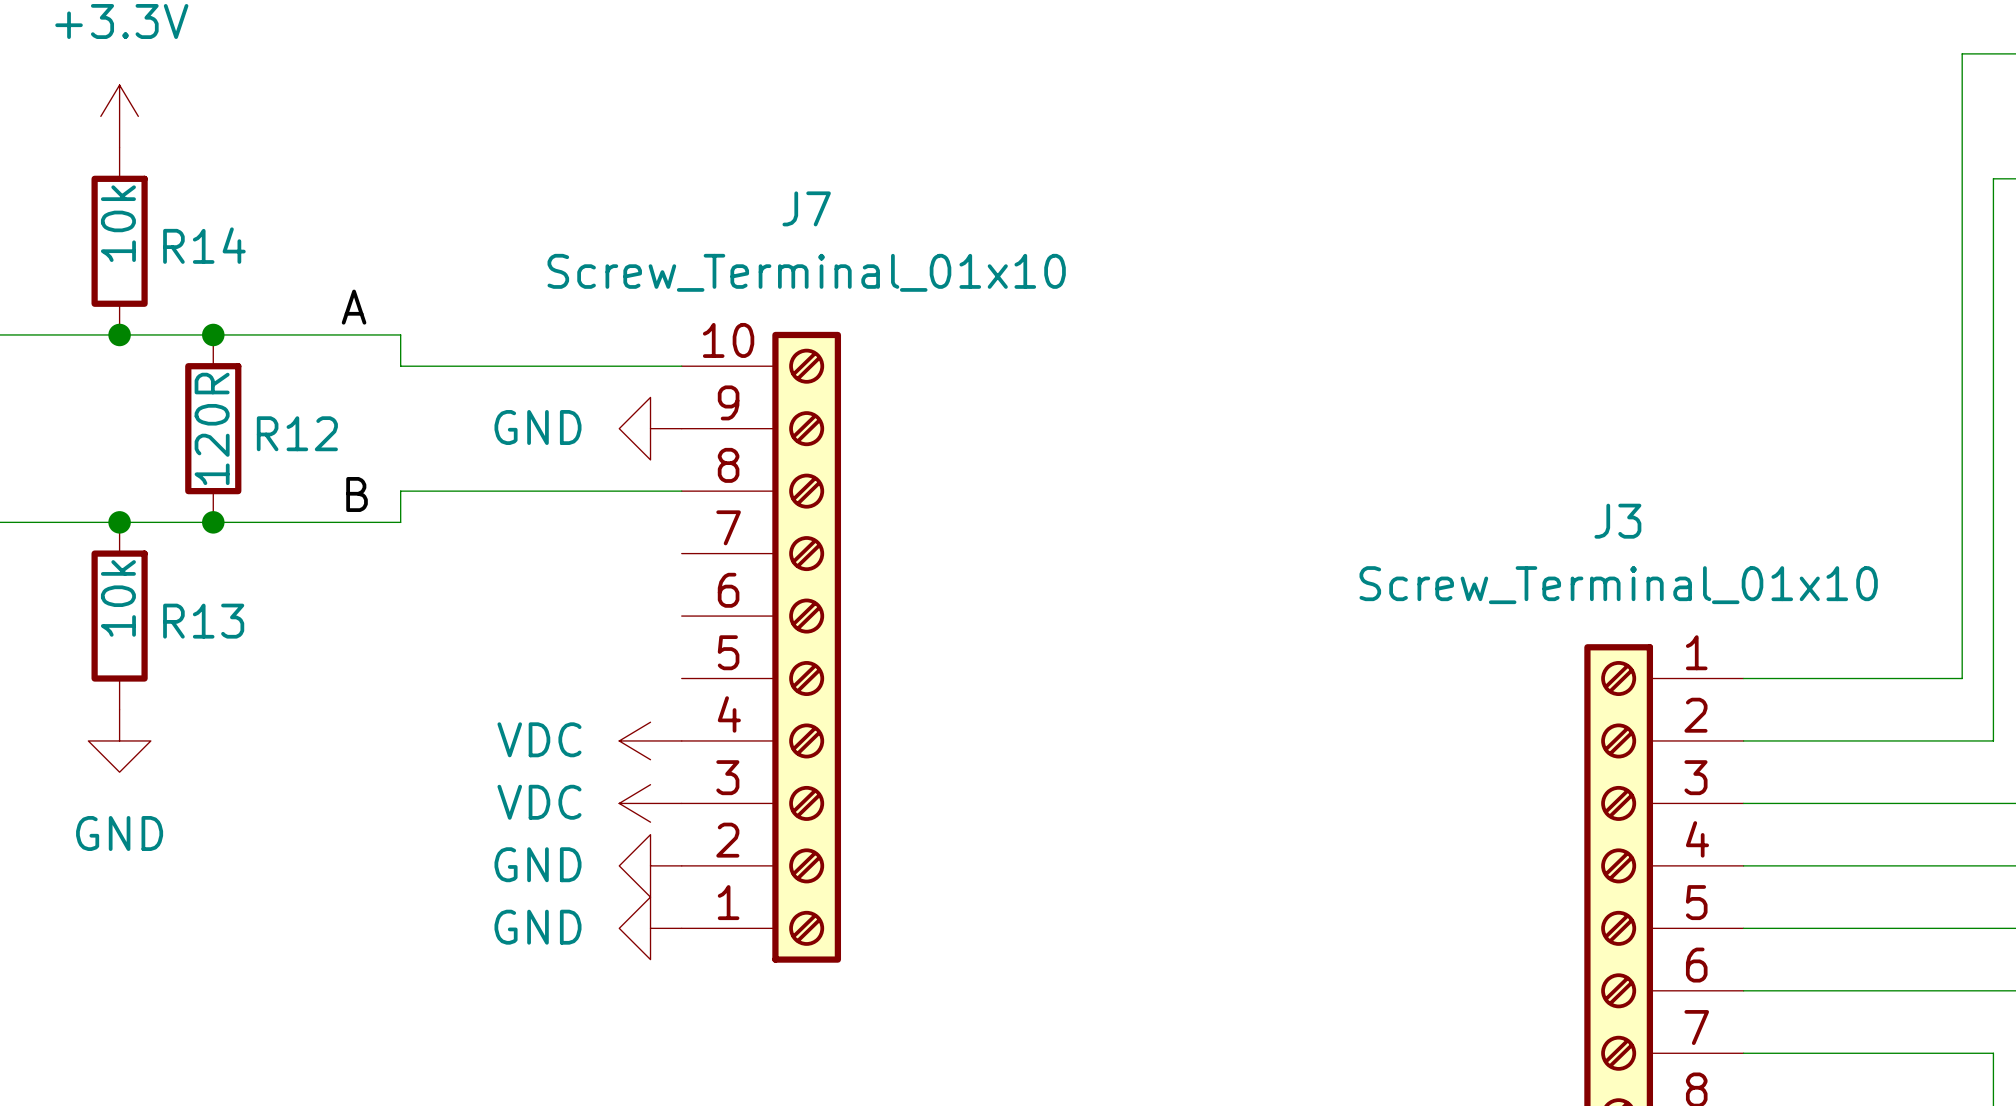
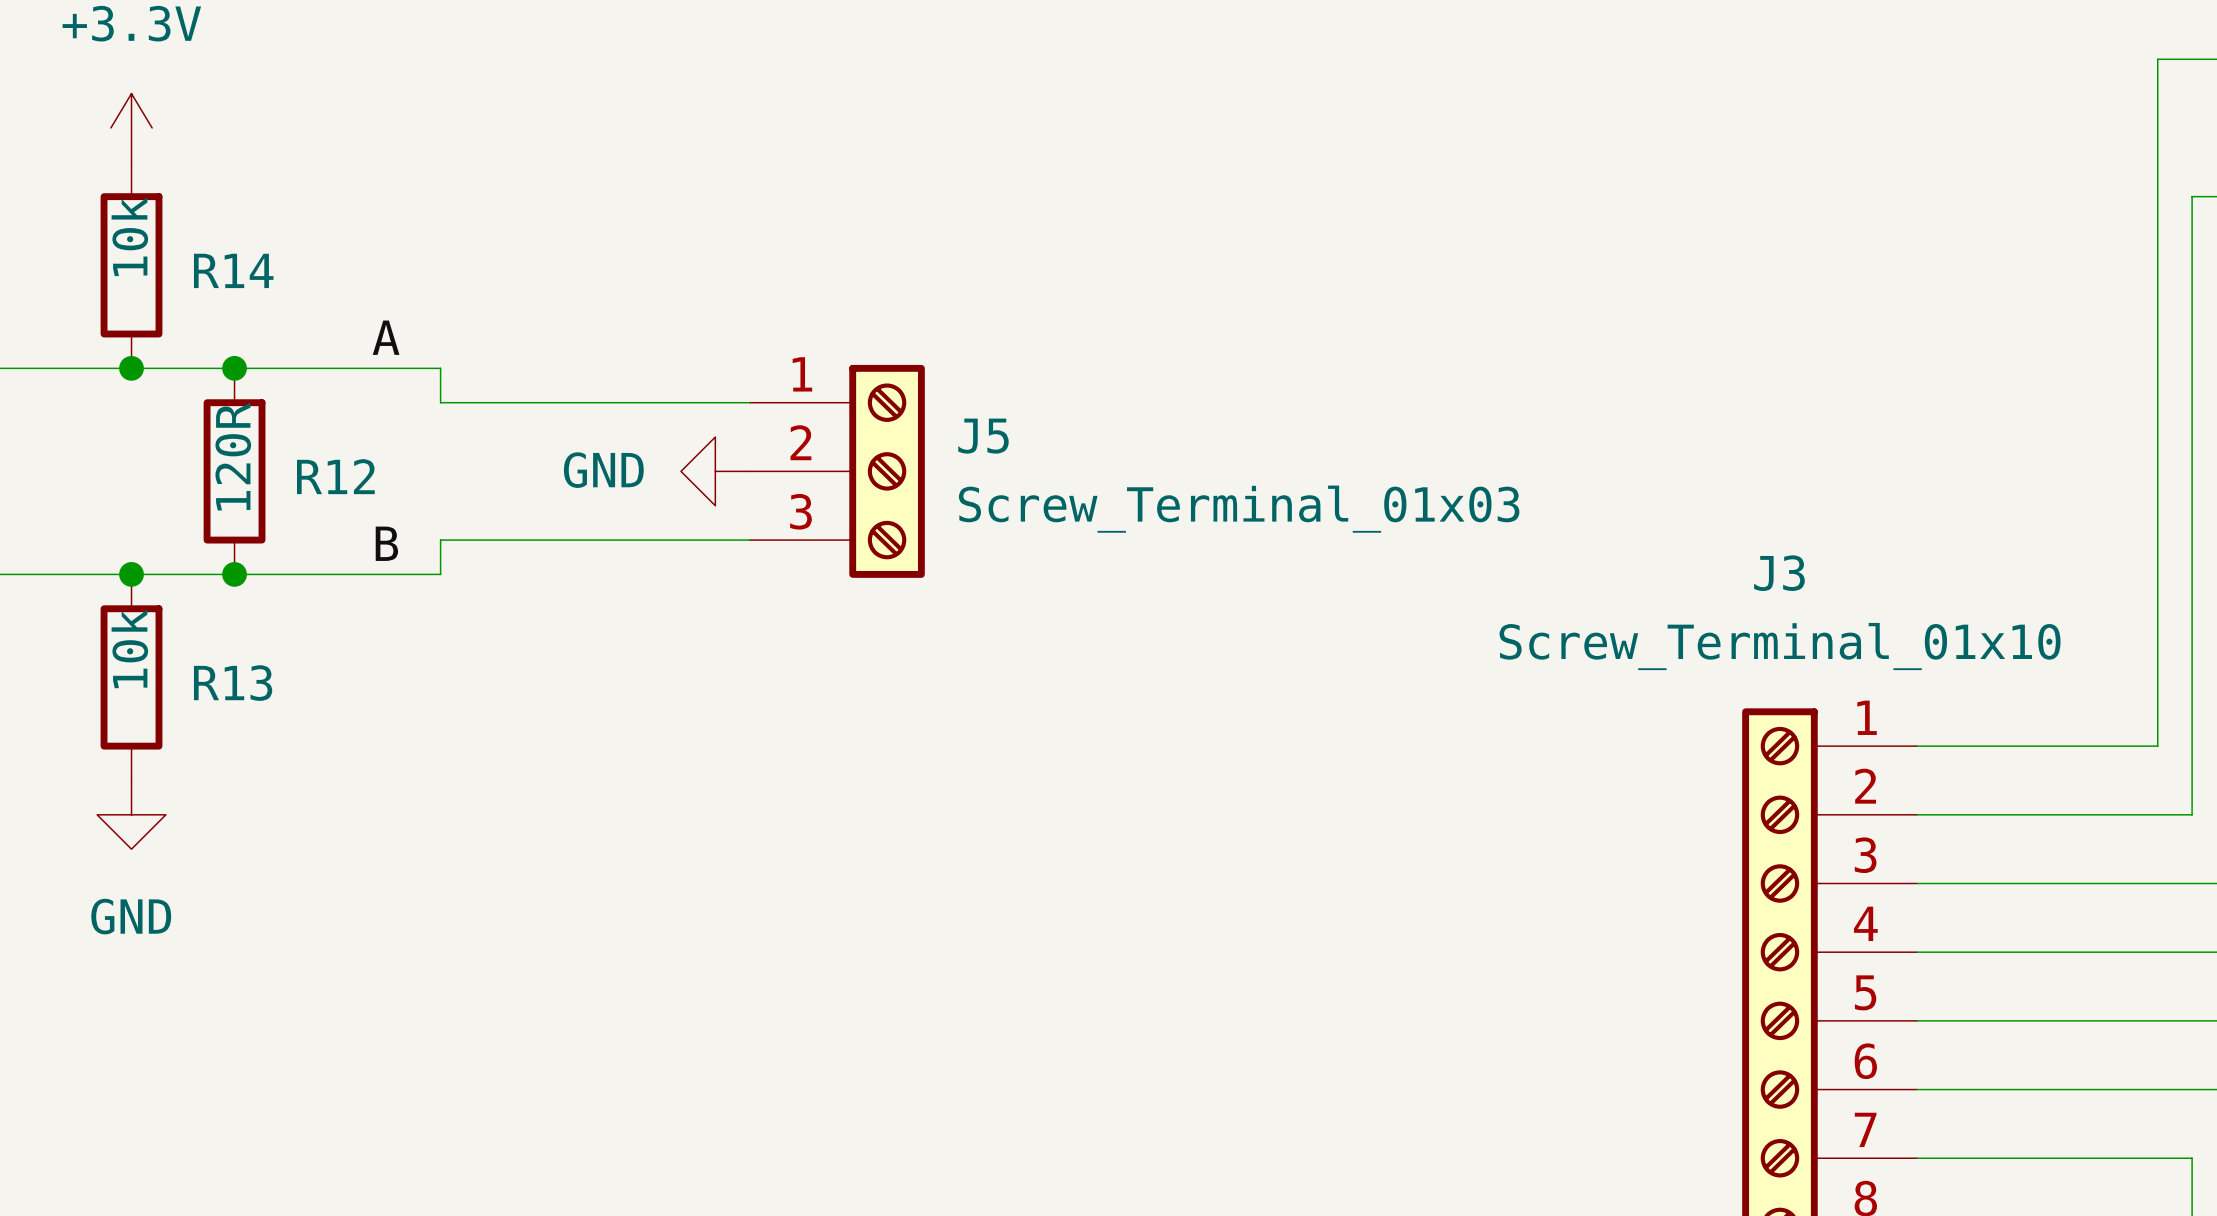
J5: none -> Screw_Terminal_01x03 (837, 471)
J7: Screw_Terminal_01x10 (761, 647) -> none
power symbol: VDC (650, 740) -> none
power symbol: VDC (650, 803) -> none
power symbol: GND (650, 865) -> none
power symbol: GND (650, 928) -> none

